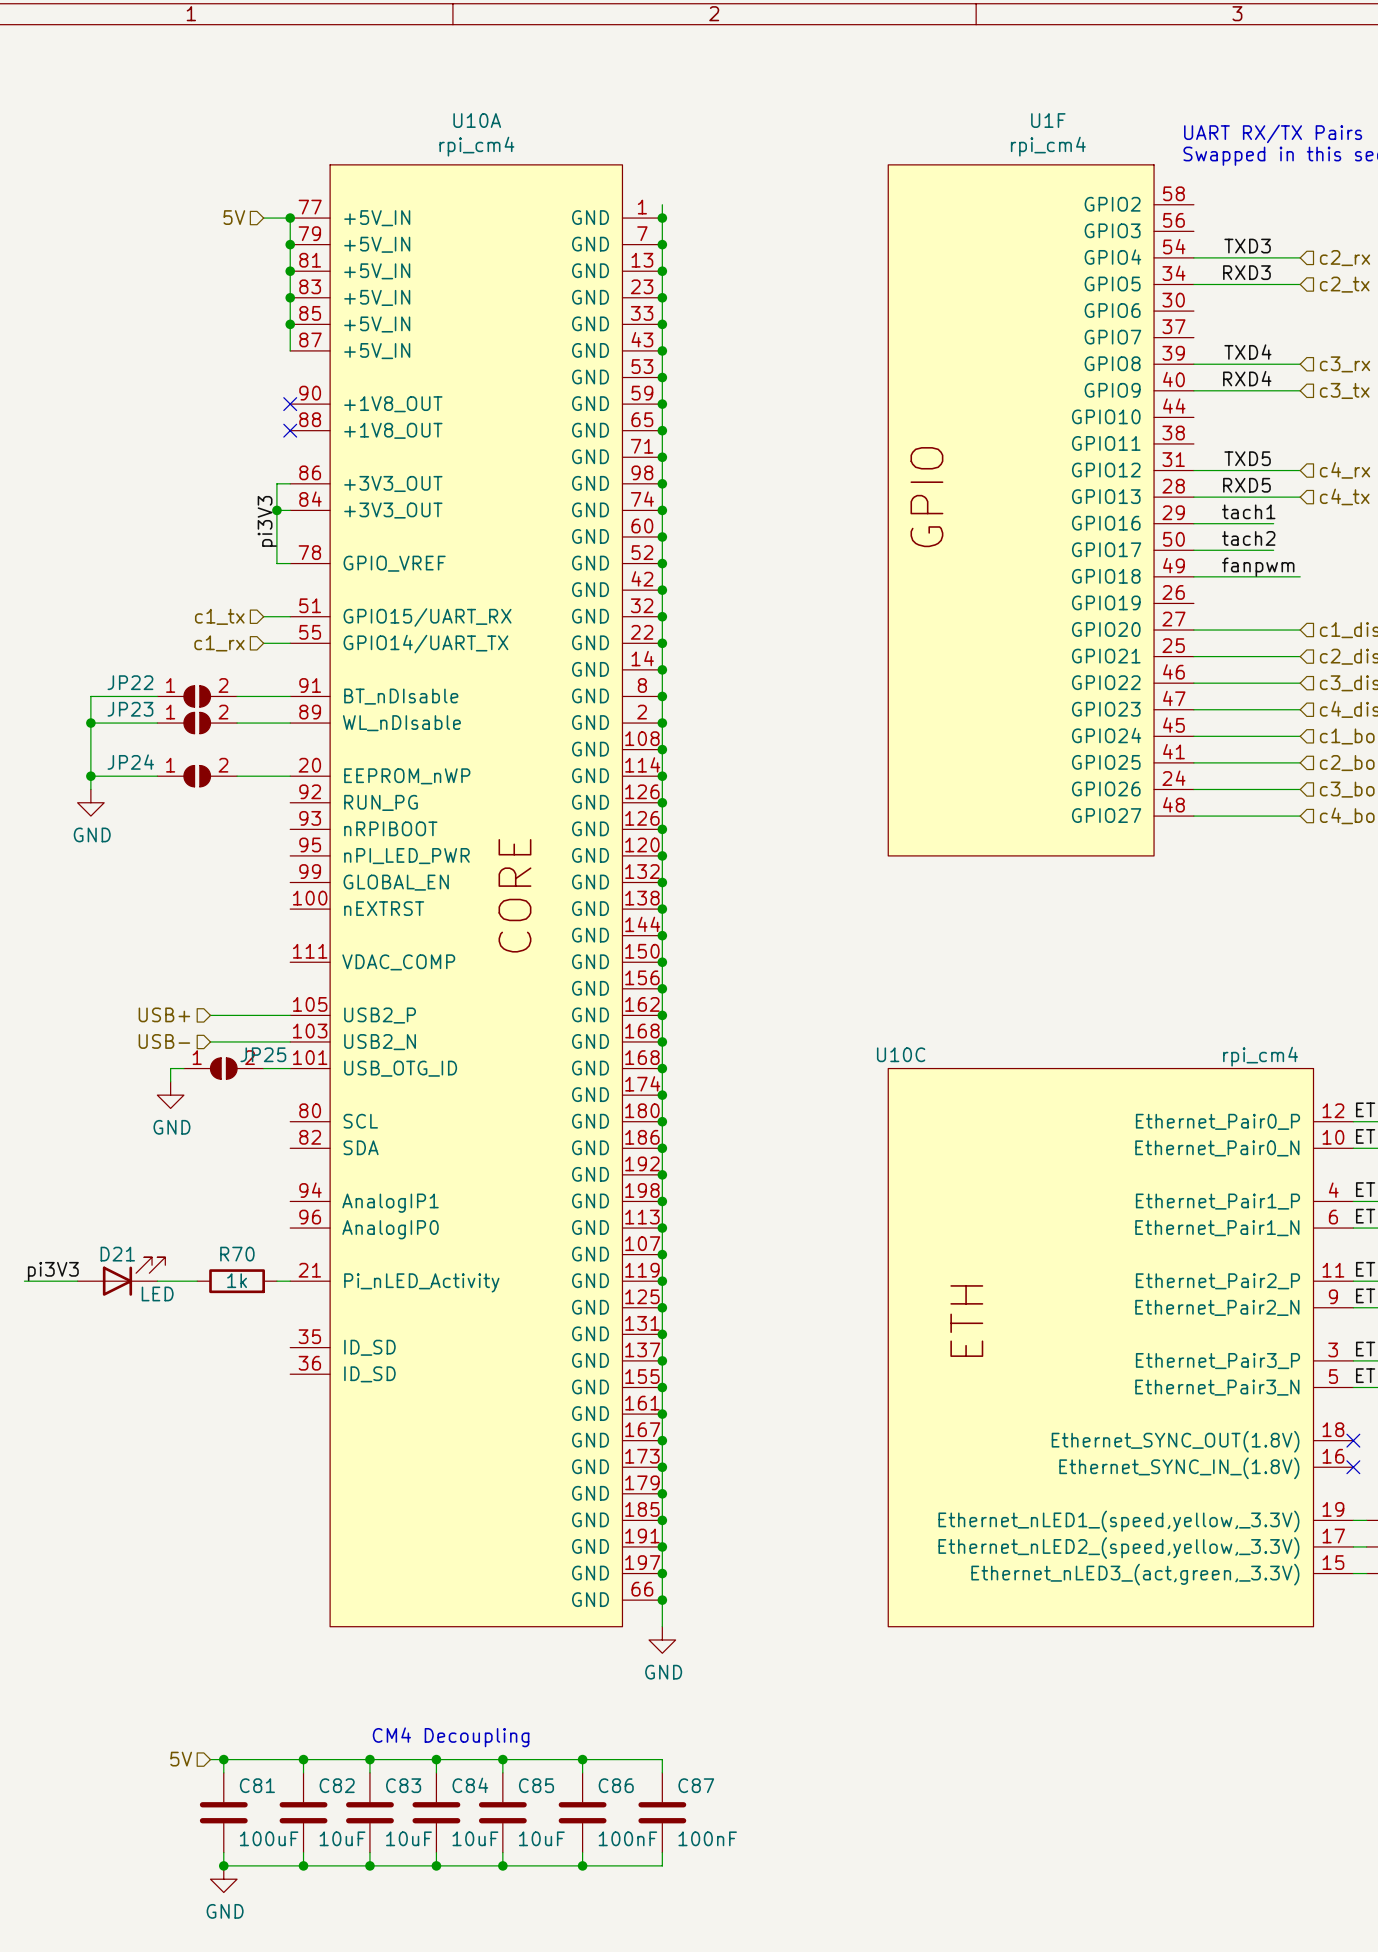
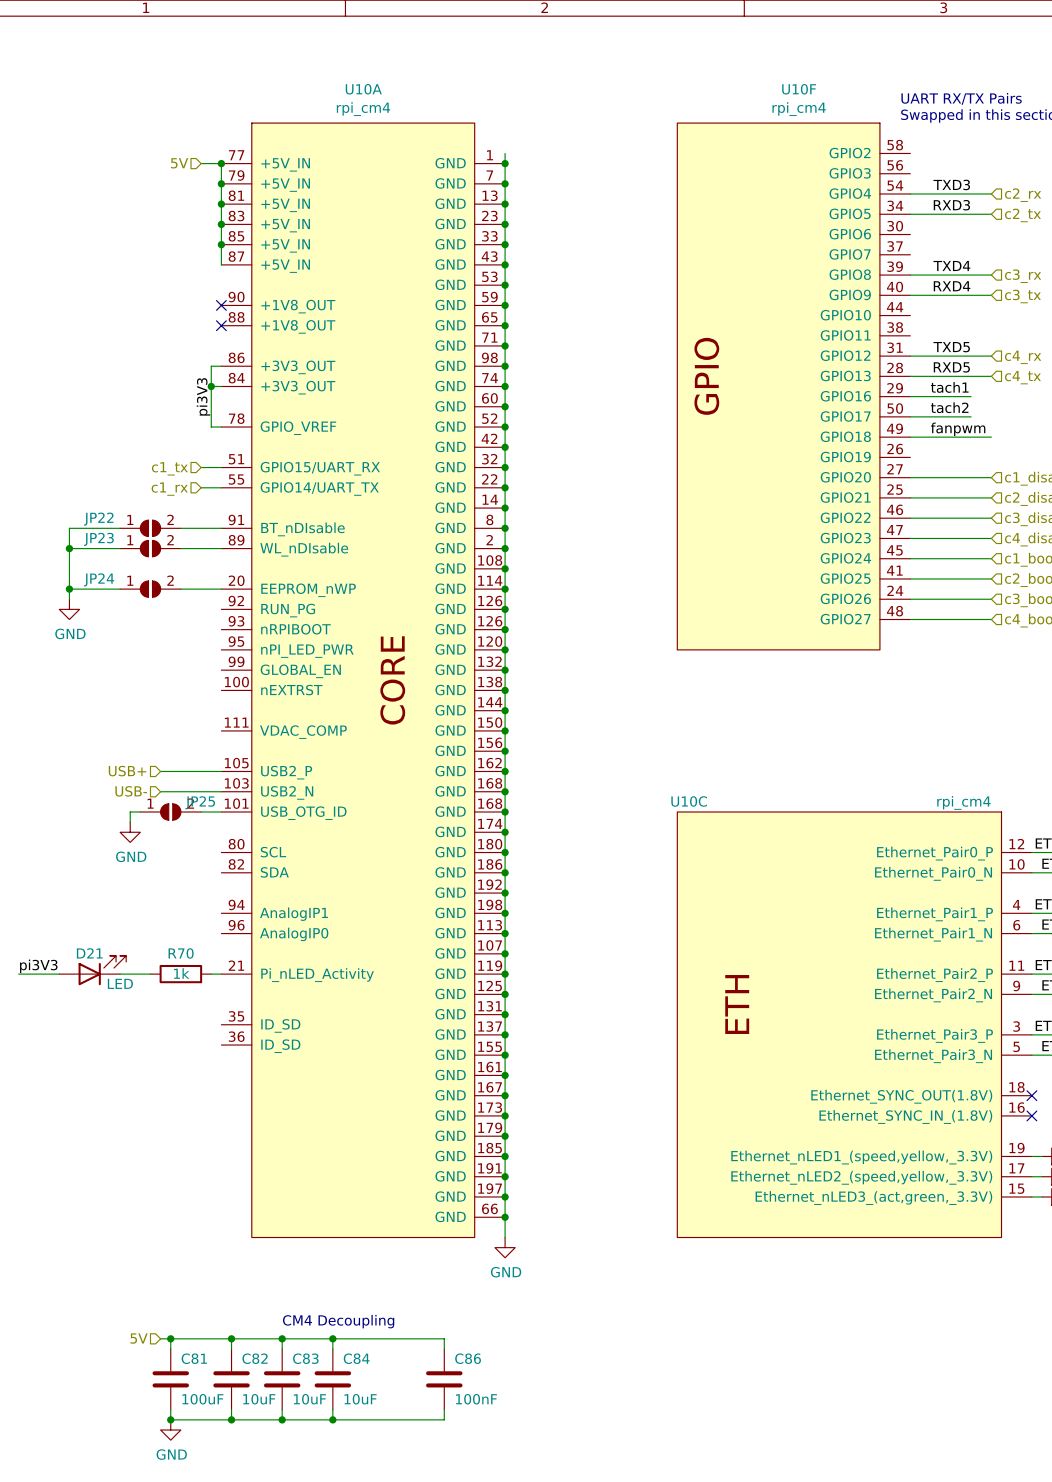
U1F name: U1F (1048, 120) -> U10F (799, 89)
wire: (502, 1759) (502, 1772) -> none
junction: (502, 1759) -> none
wire: (582, 1759) (662, 1759) (662, 1772) -> none
junction: (582, 1759) -> none
C85: 10uF (502, 1812) -> none
C87: 100nF (662, 1812) -> none
wire: (502, 1852) (502, 1865) -> none
wire: (662, 1852) (662, 1865) (582, 1865) -> none
junction: (502, 1865) -> none
junction: (582, 1865) -> none

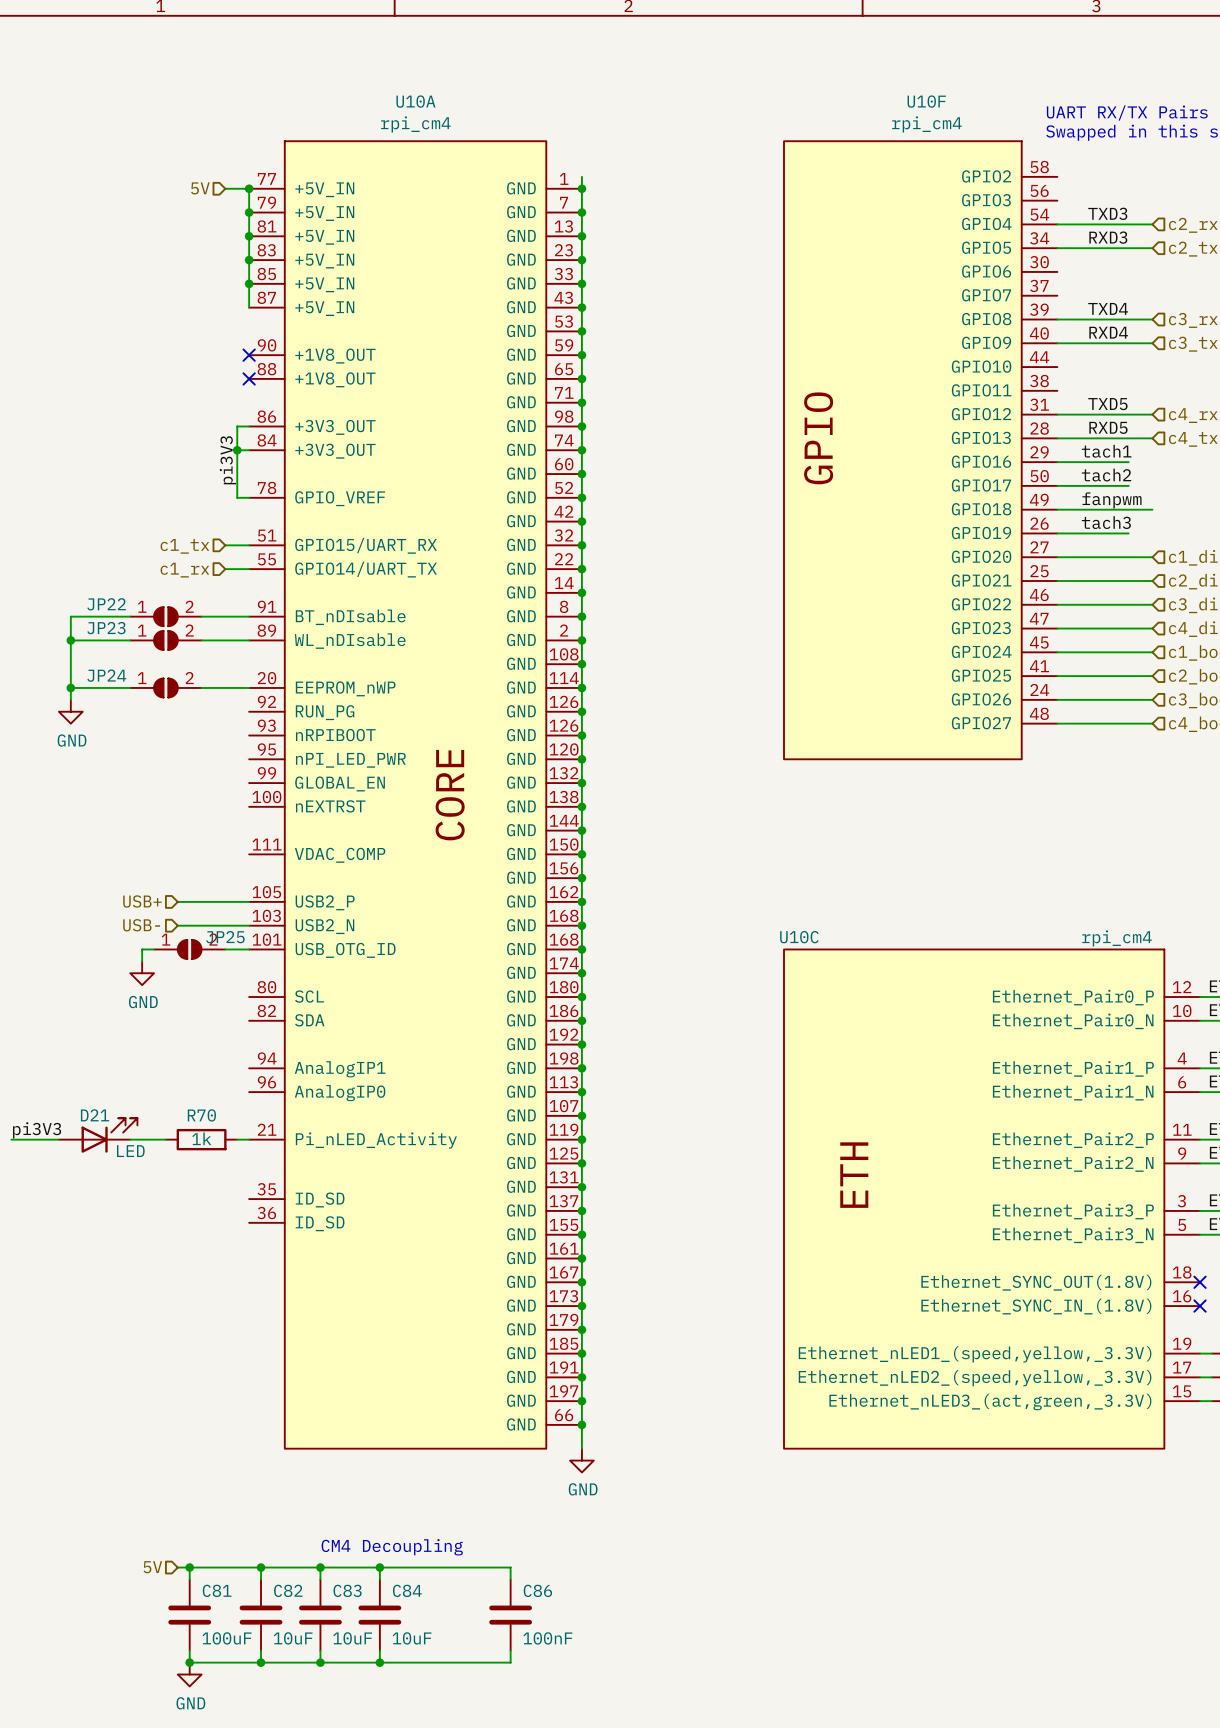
label: none -> tach3 (1106, 522)
wire: none -> (1057, 533) (1128, 533)

